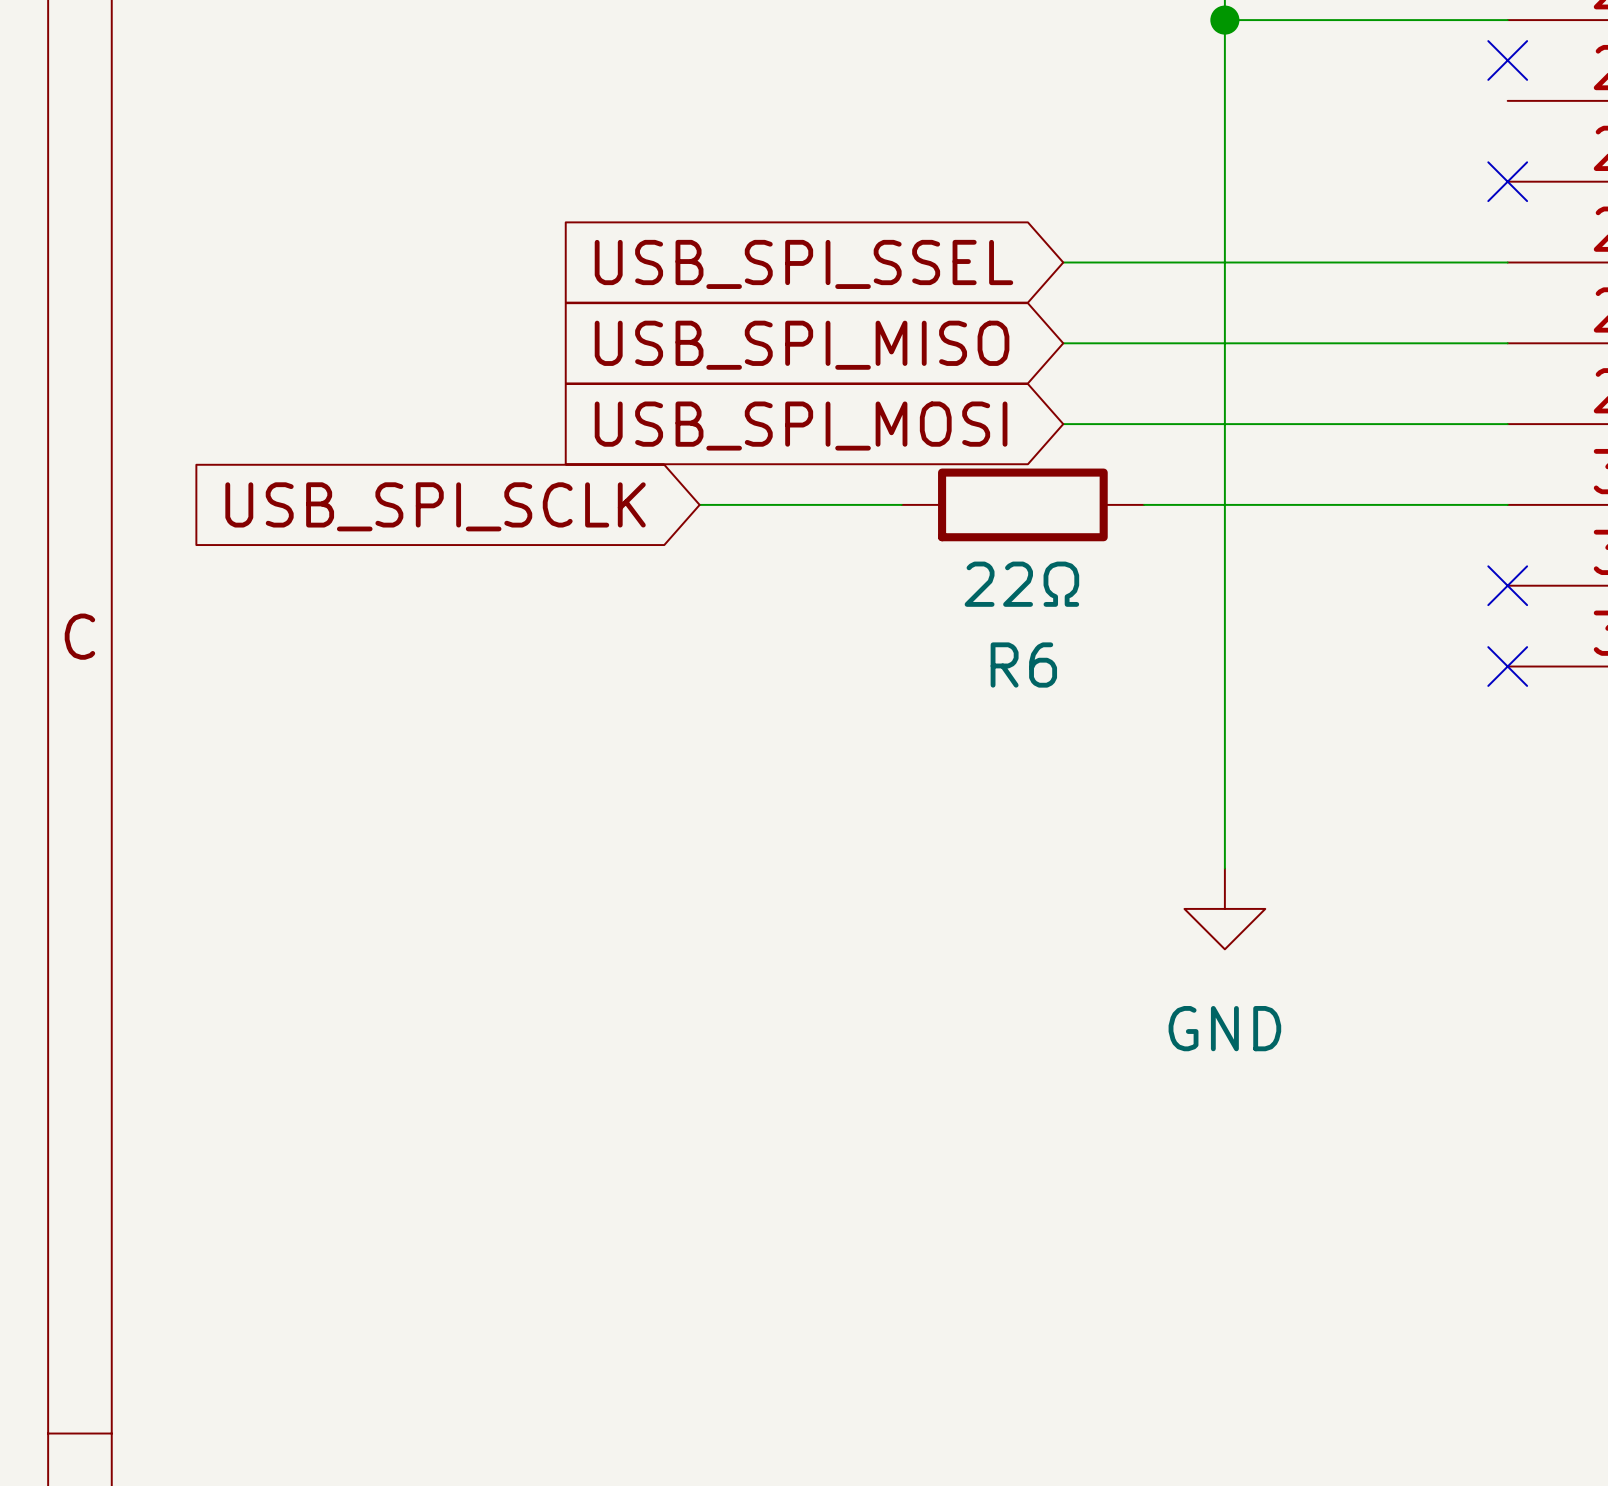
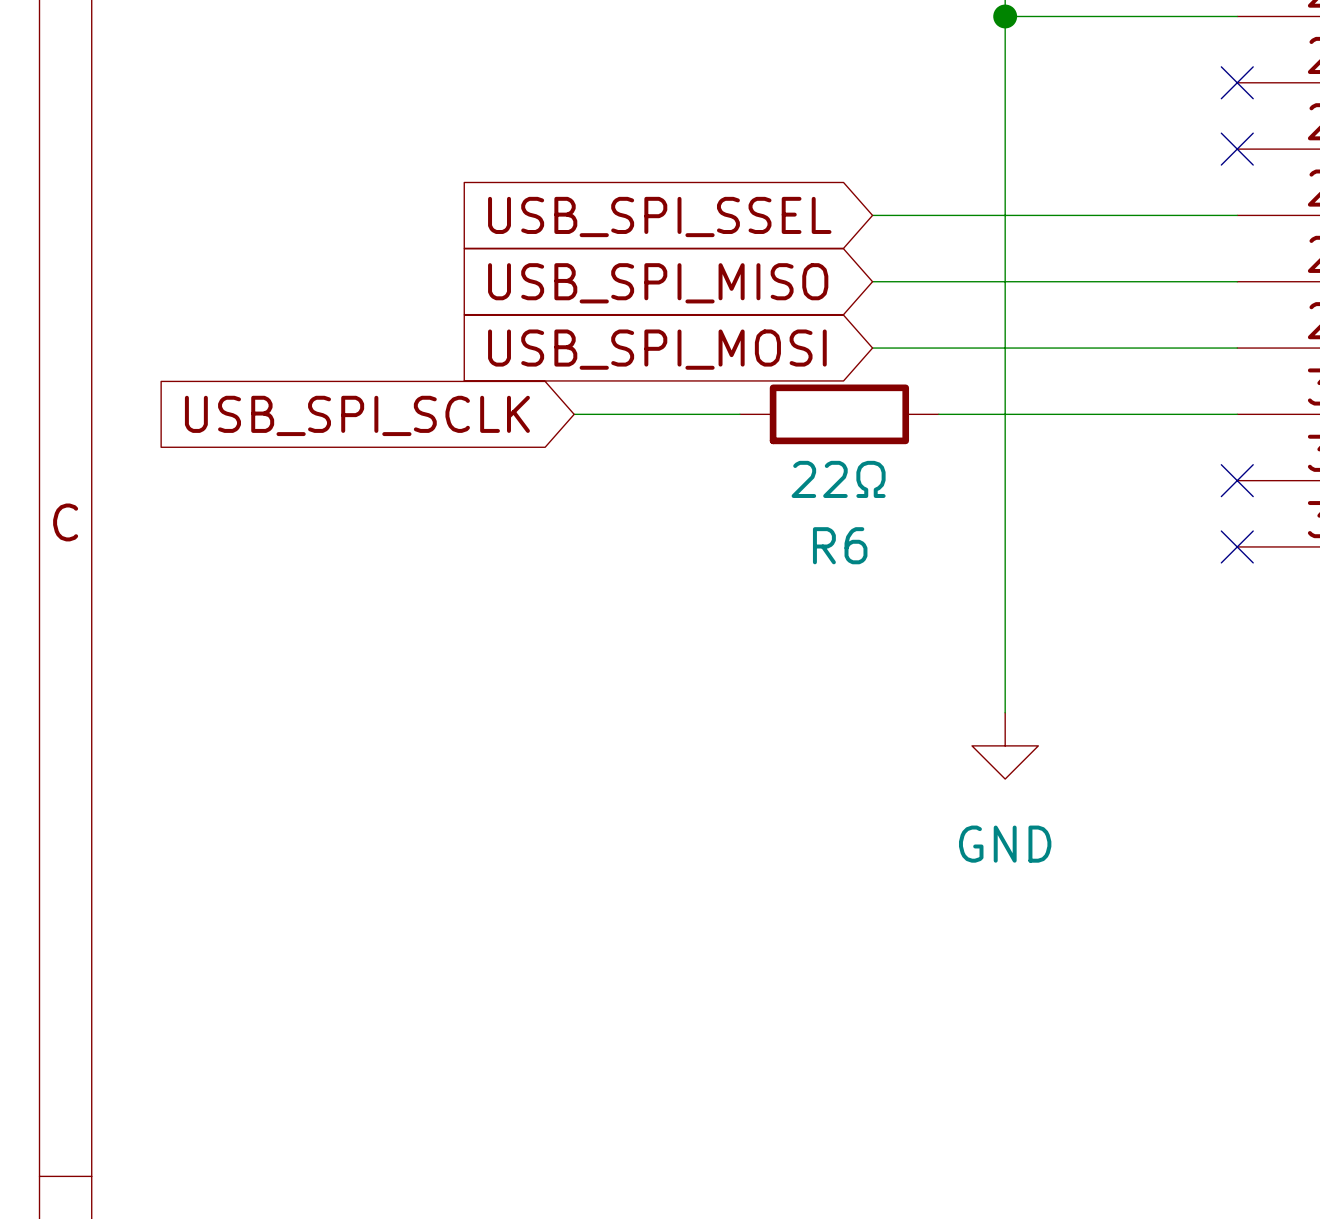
no-connect mark position: (1507, 60) -> (1237, 82)

